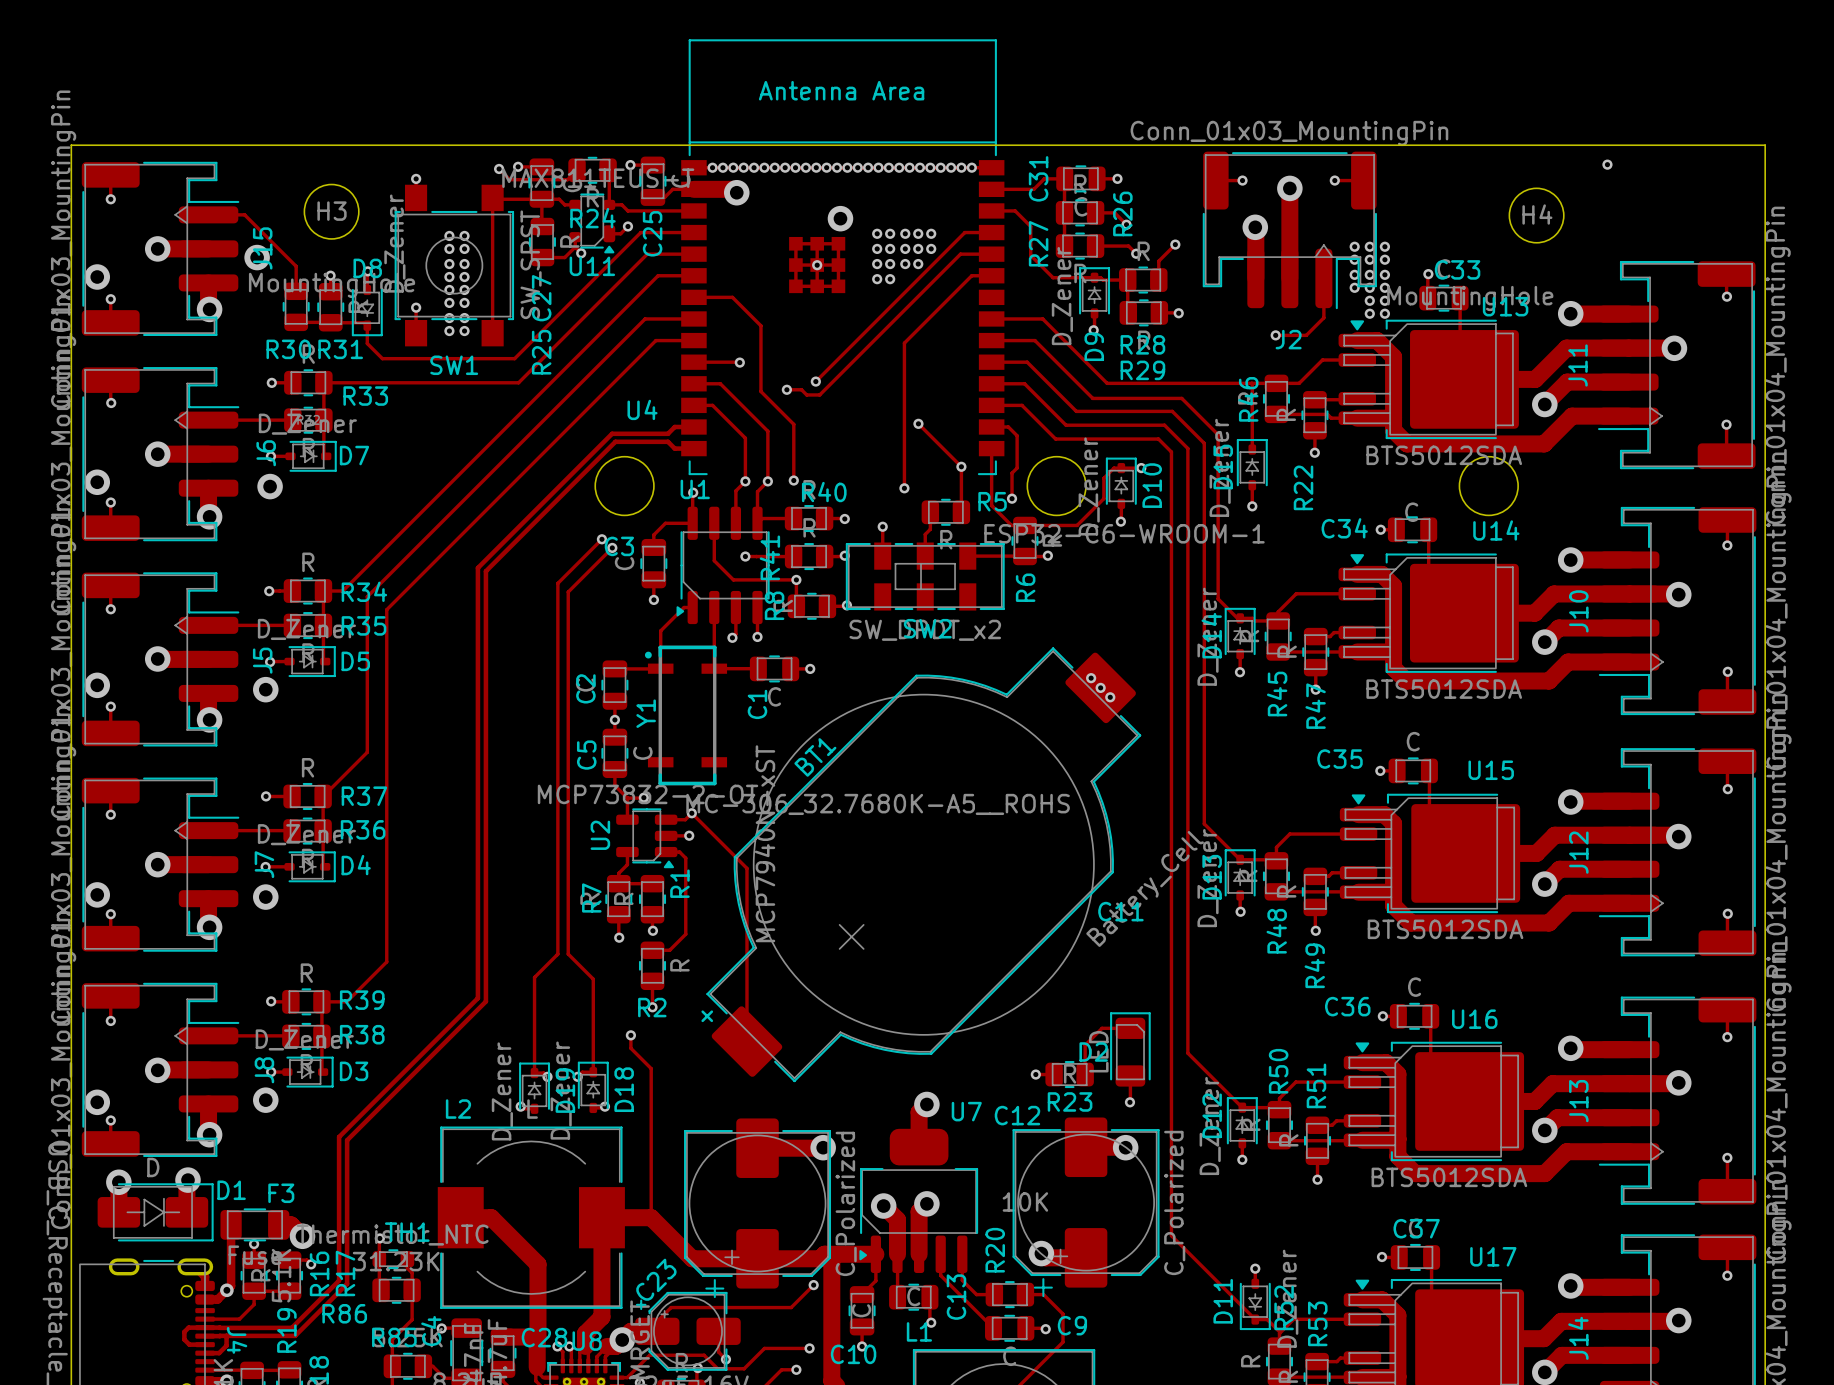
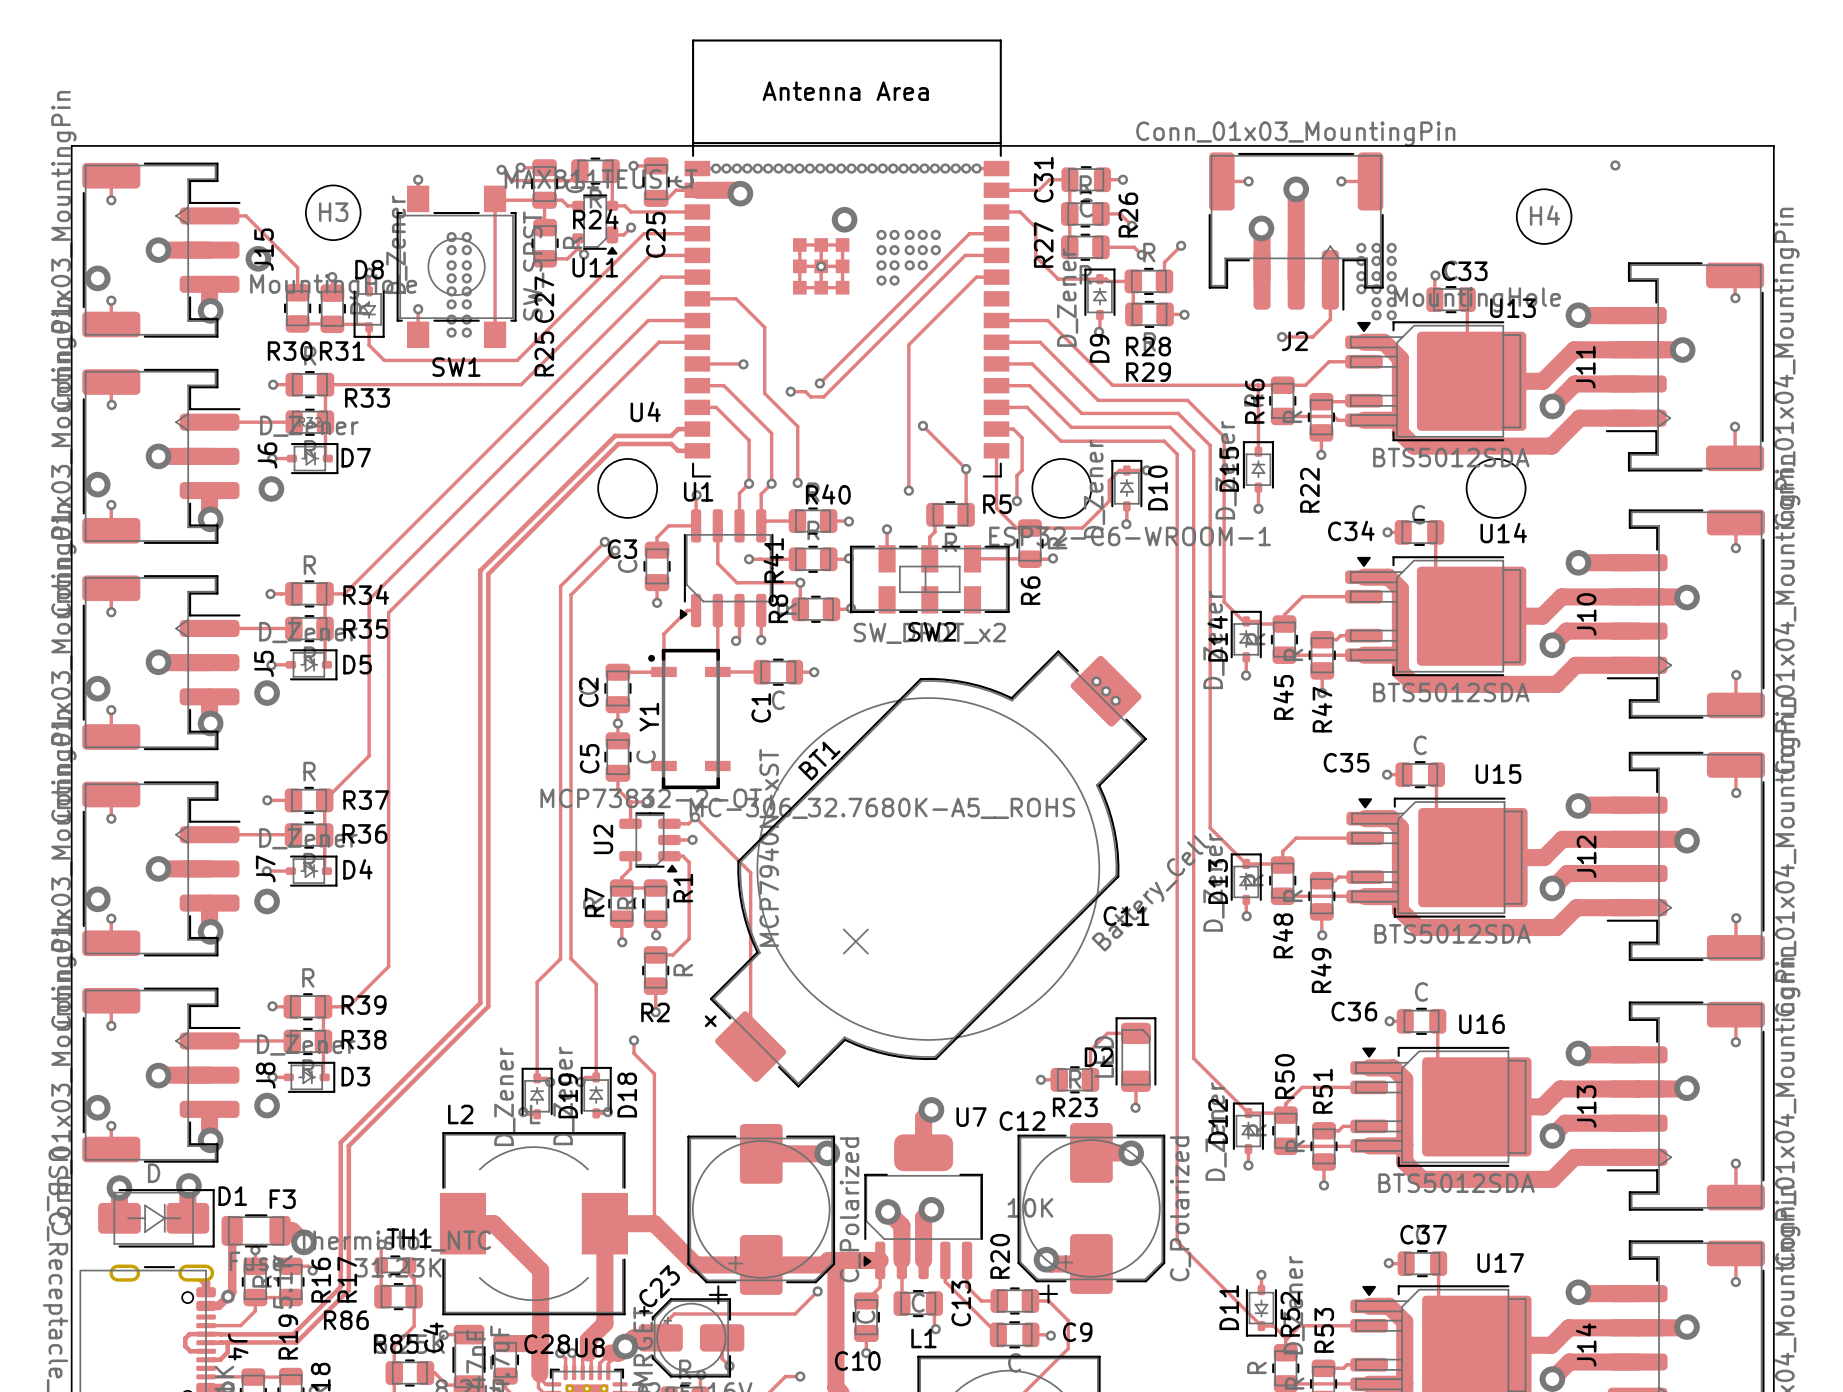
track: (809, 1348) (764, 1348) (744, 1368) (717, 1368) (704, 1355) (649, 1355) (627, 1377) (617, 1377) -> none
via: (809, 1348) -> none

